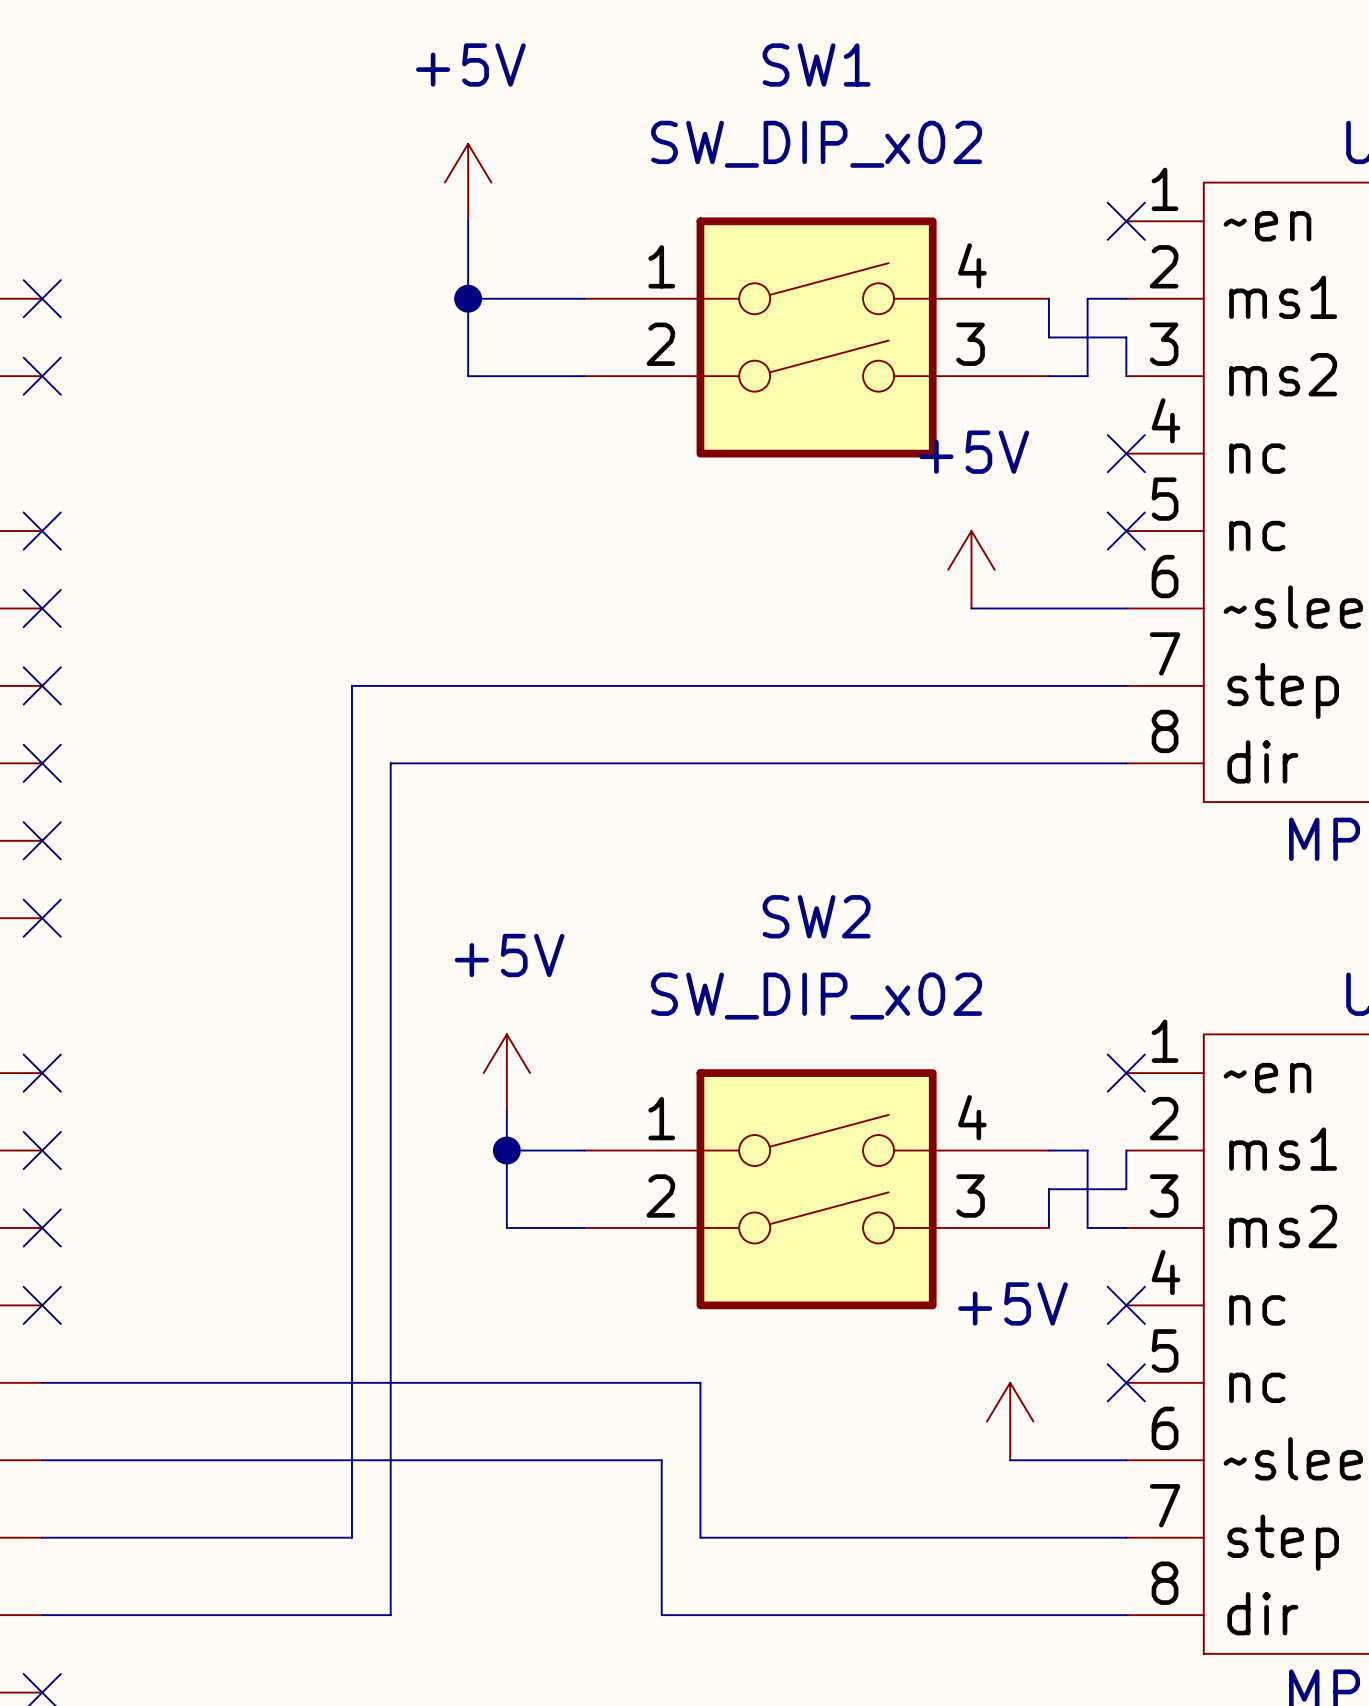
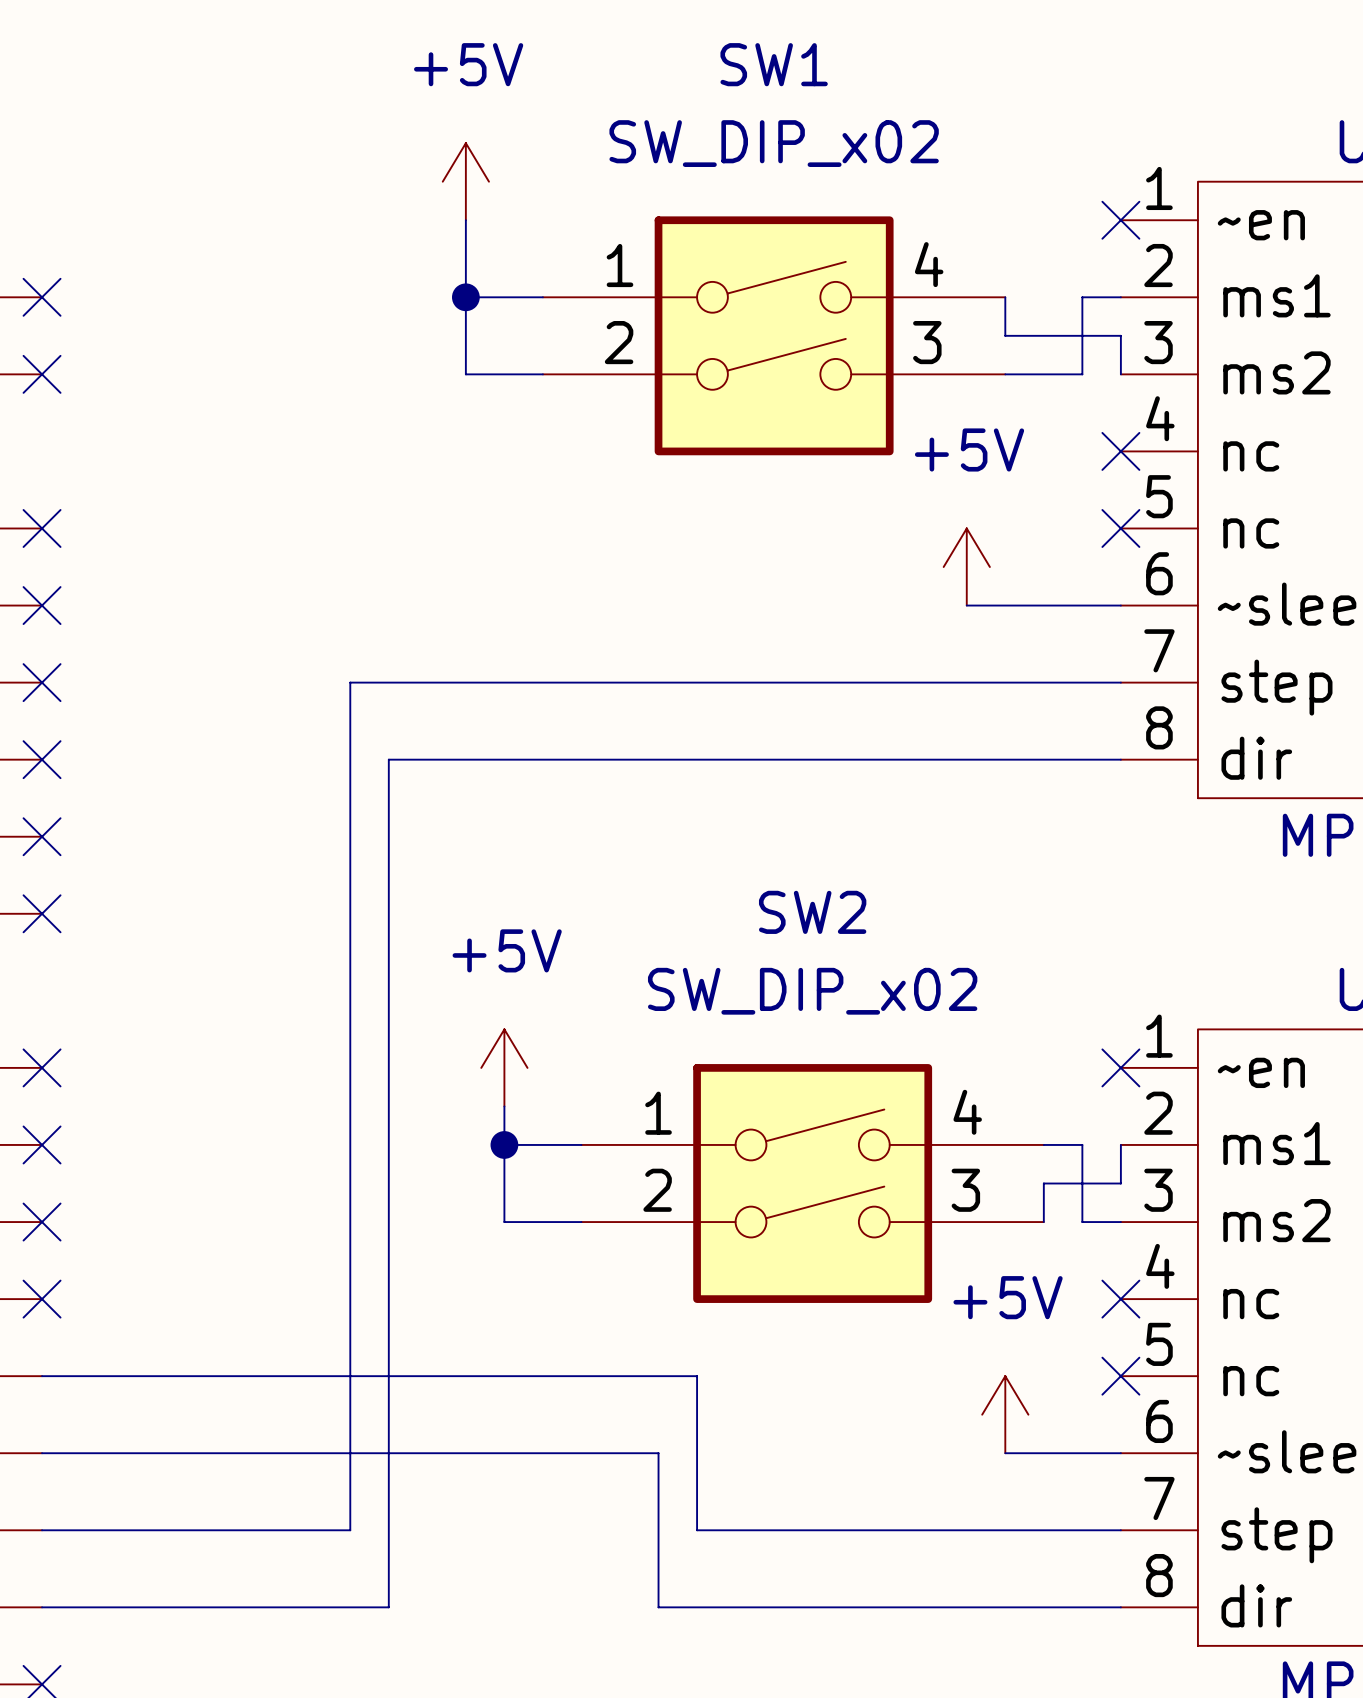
wire: (1048, 298) (1048, 337) -> (1005, 297) (1005, 335) (1043, 335)
SW1 position: (816, 337) -> (774, 335)

